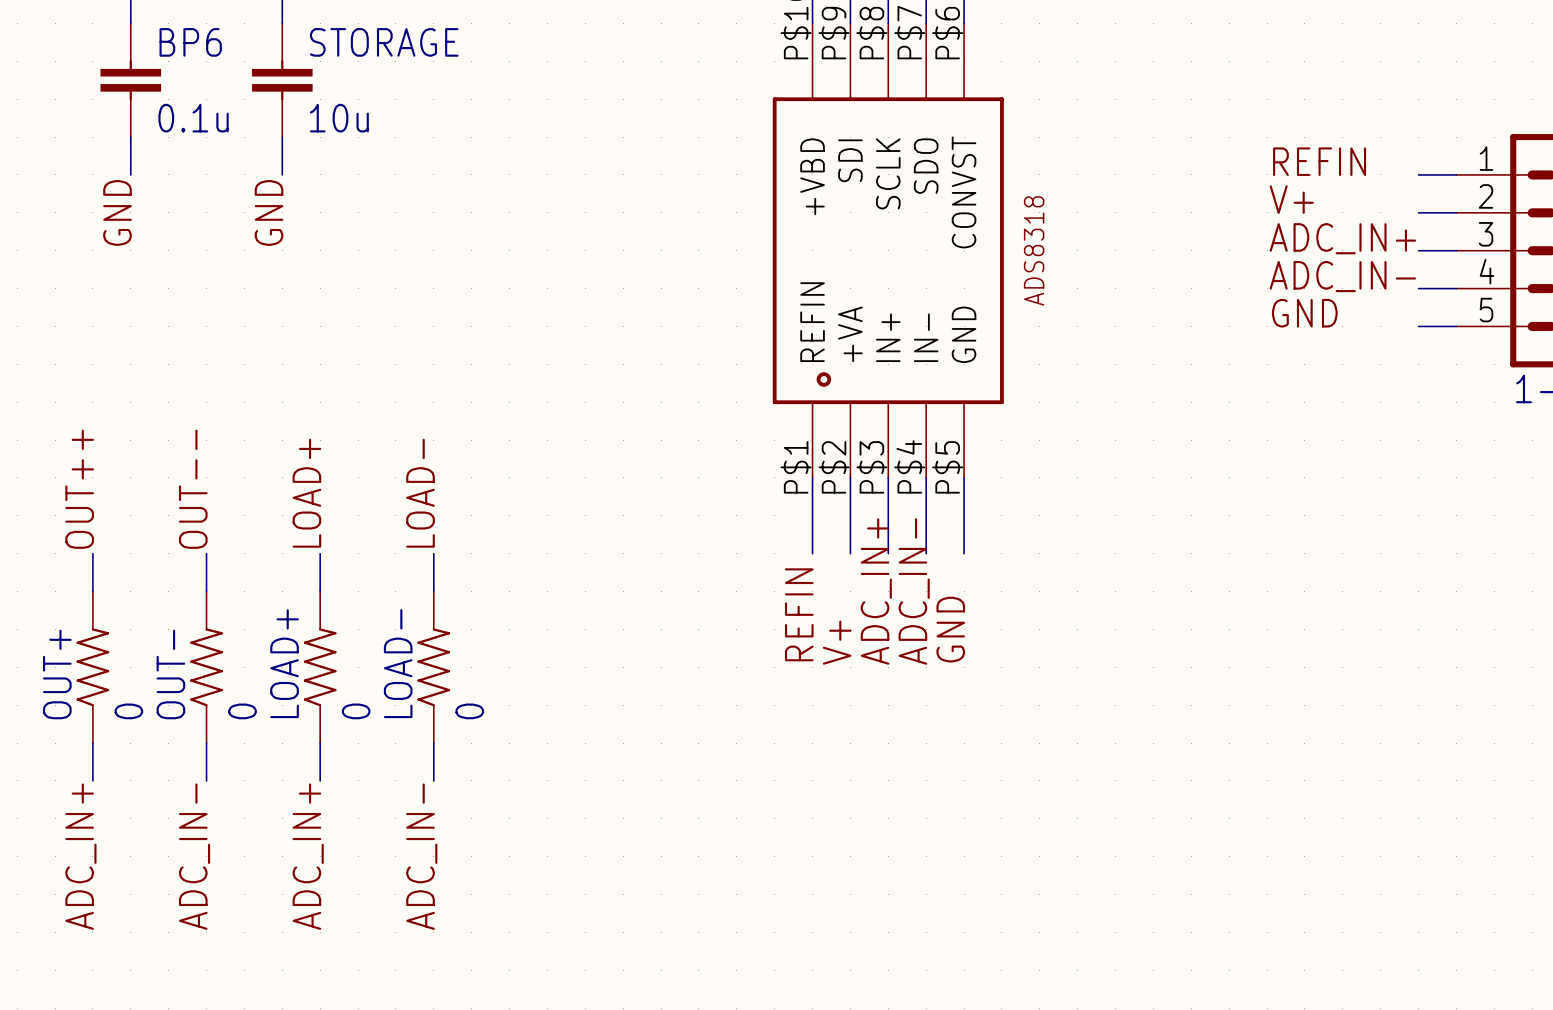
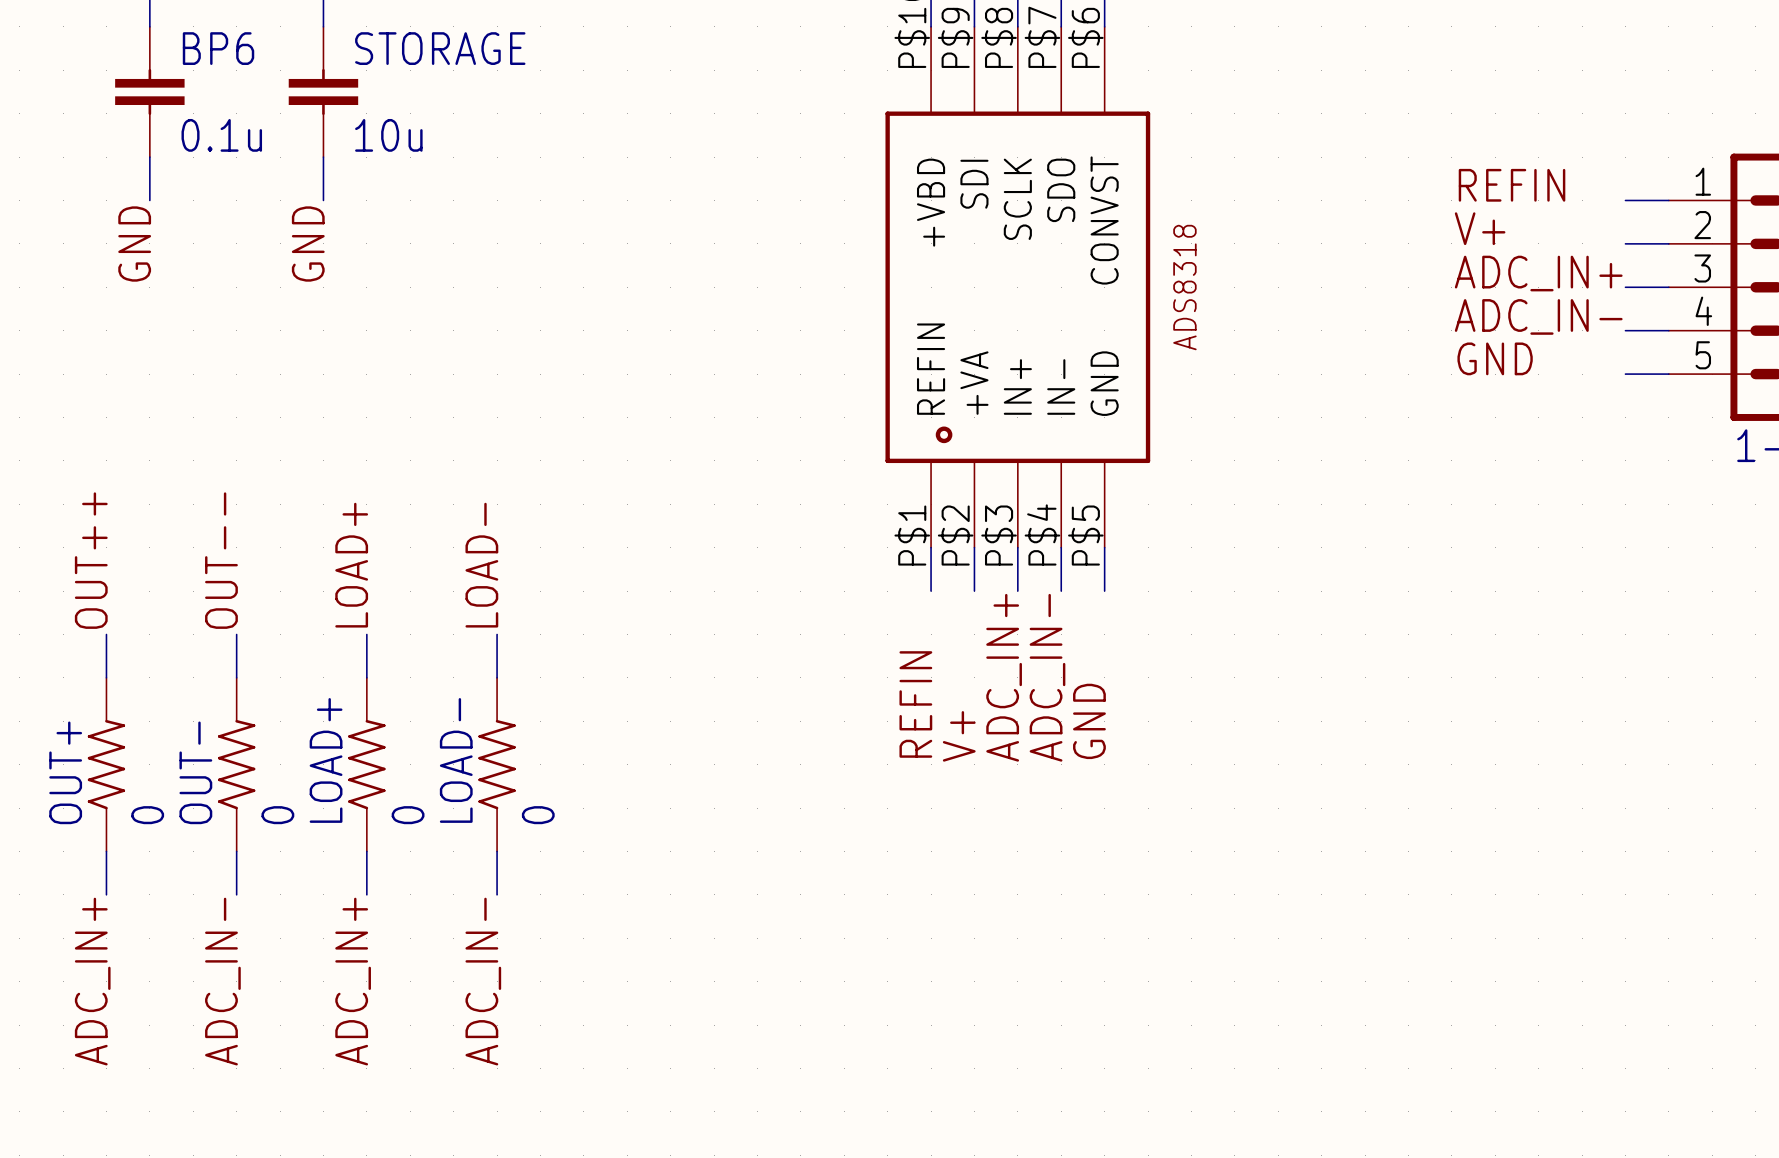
wire: (812, 515) (812, 553) -> none
wire: (850, 515) (850, 553) -> none
wire: (888, 515) (888, 553) -> none
wire: (926, 515) (926, 553) -> none
wire: (964, 515) (964, 553) -> none

